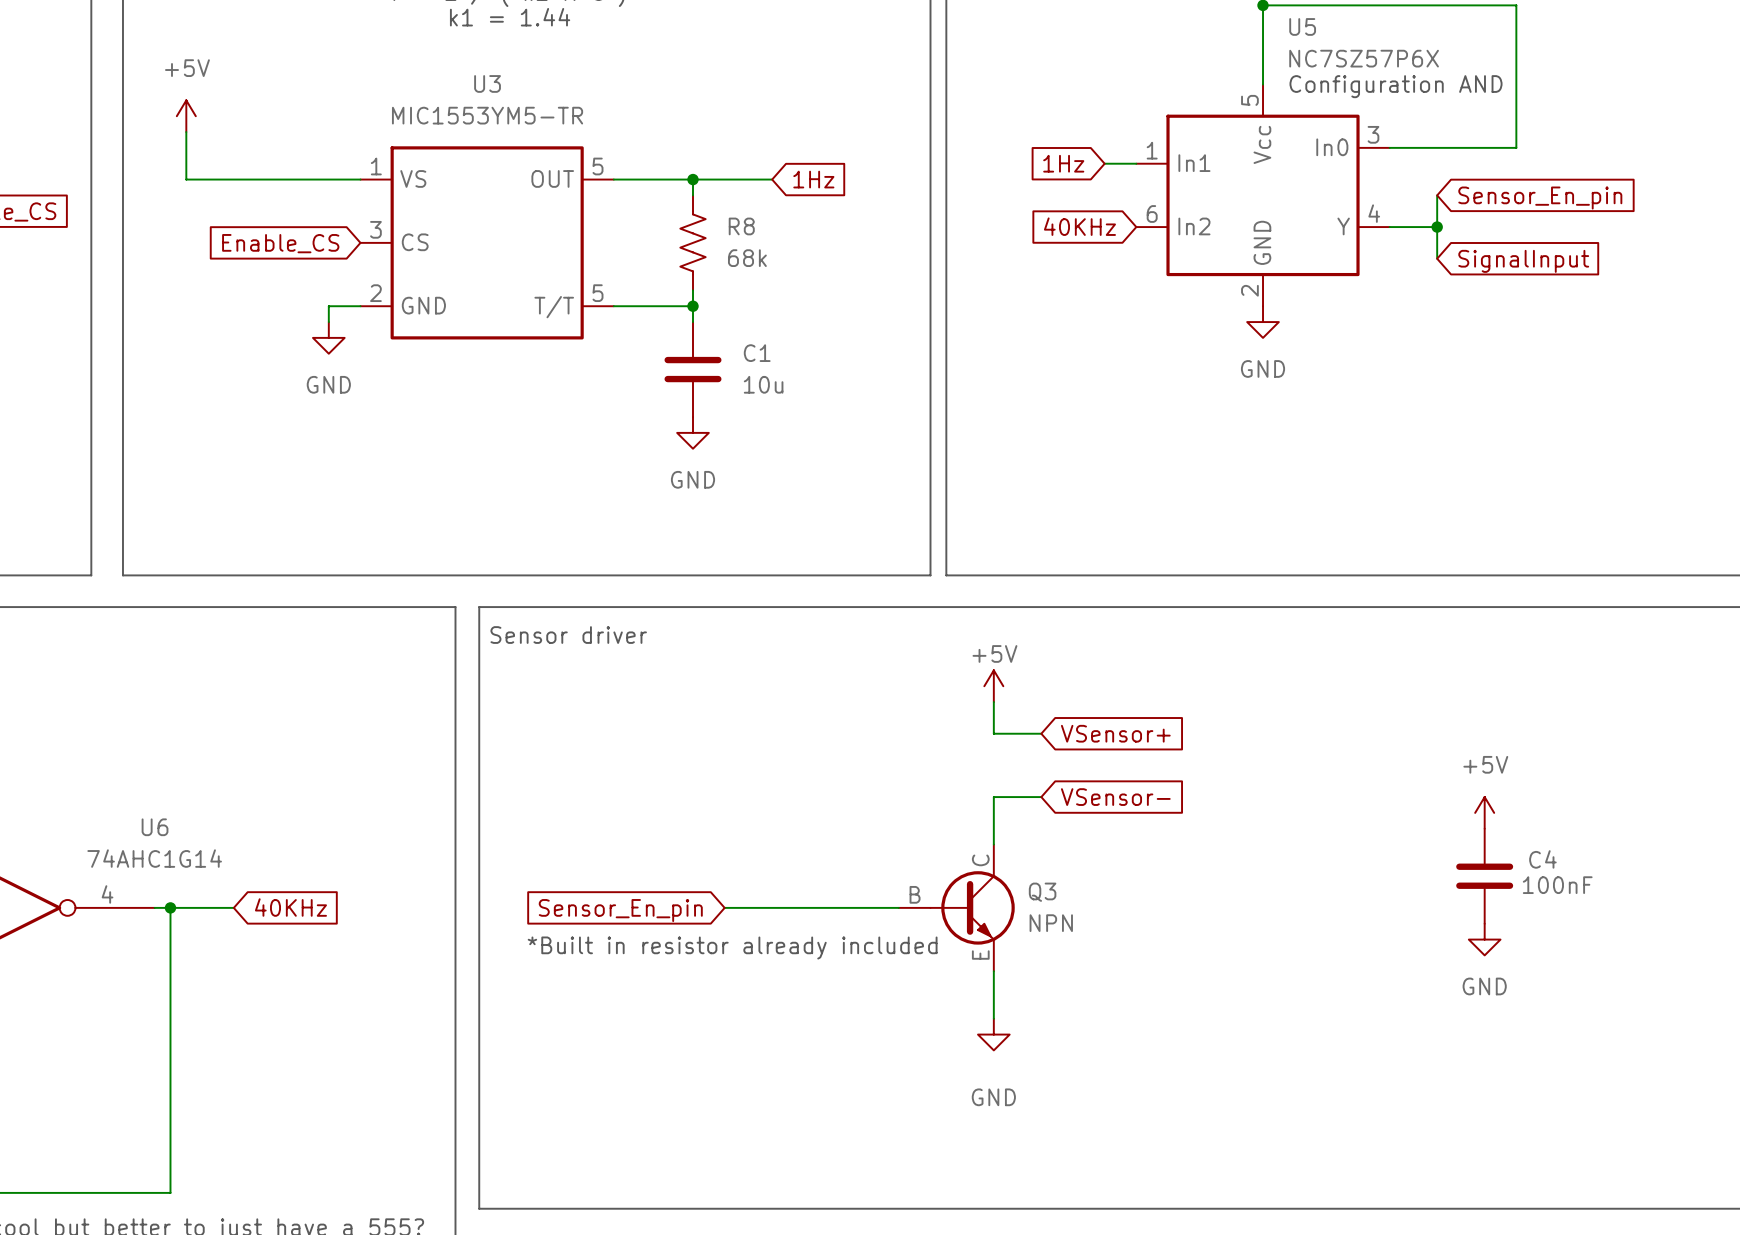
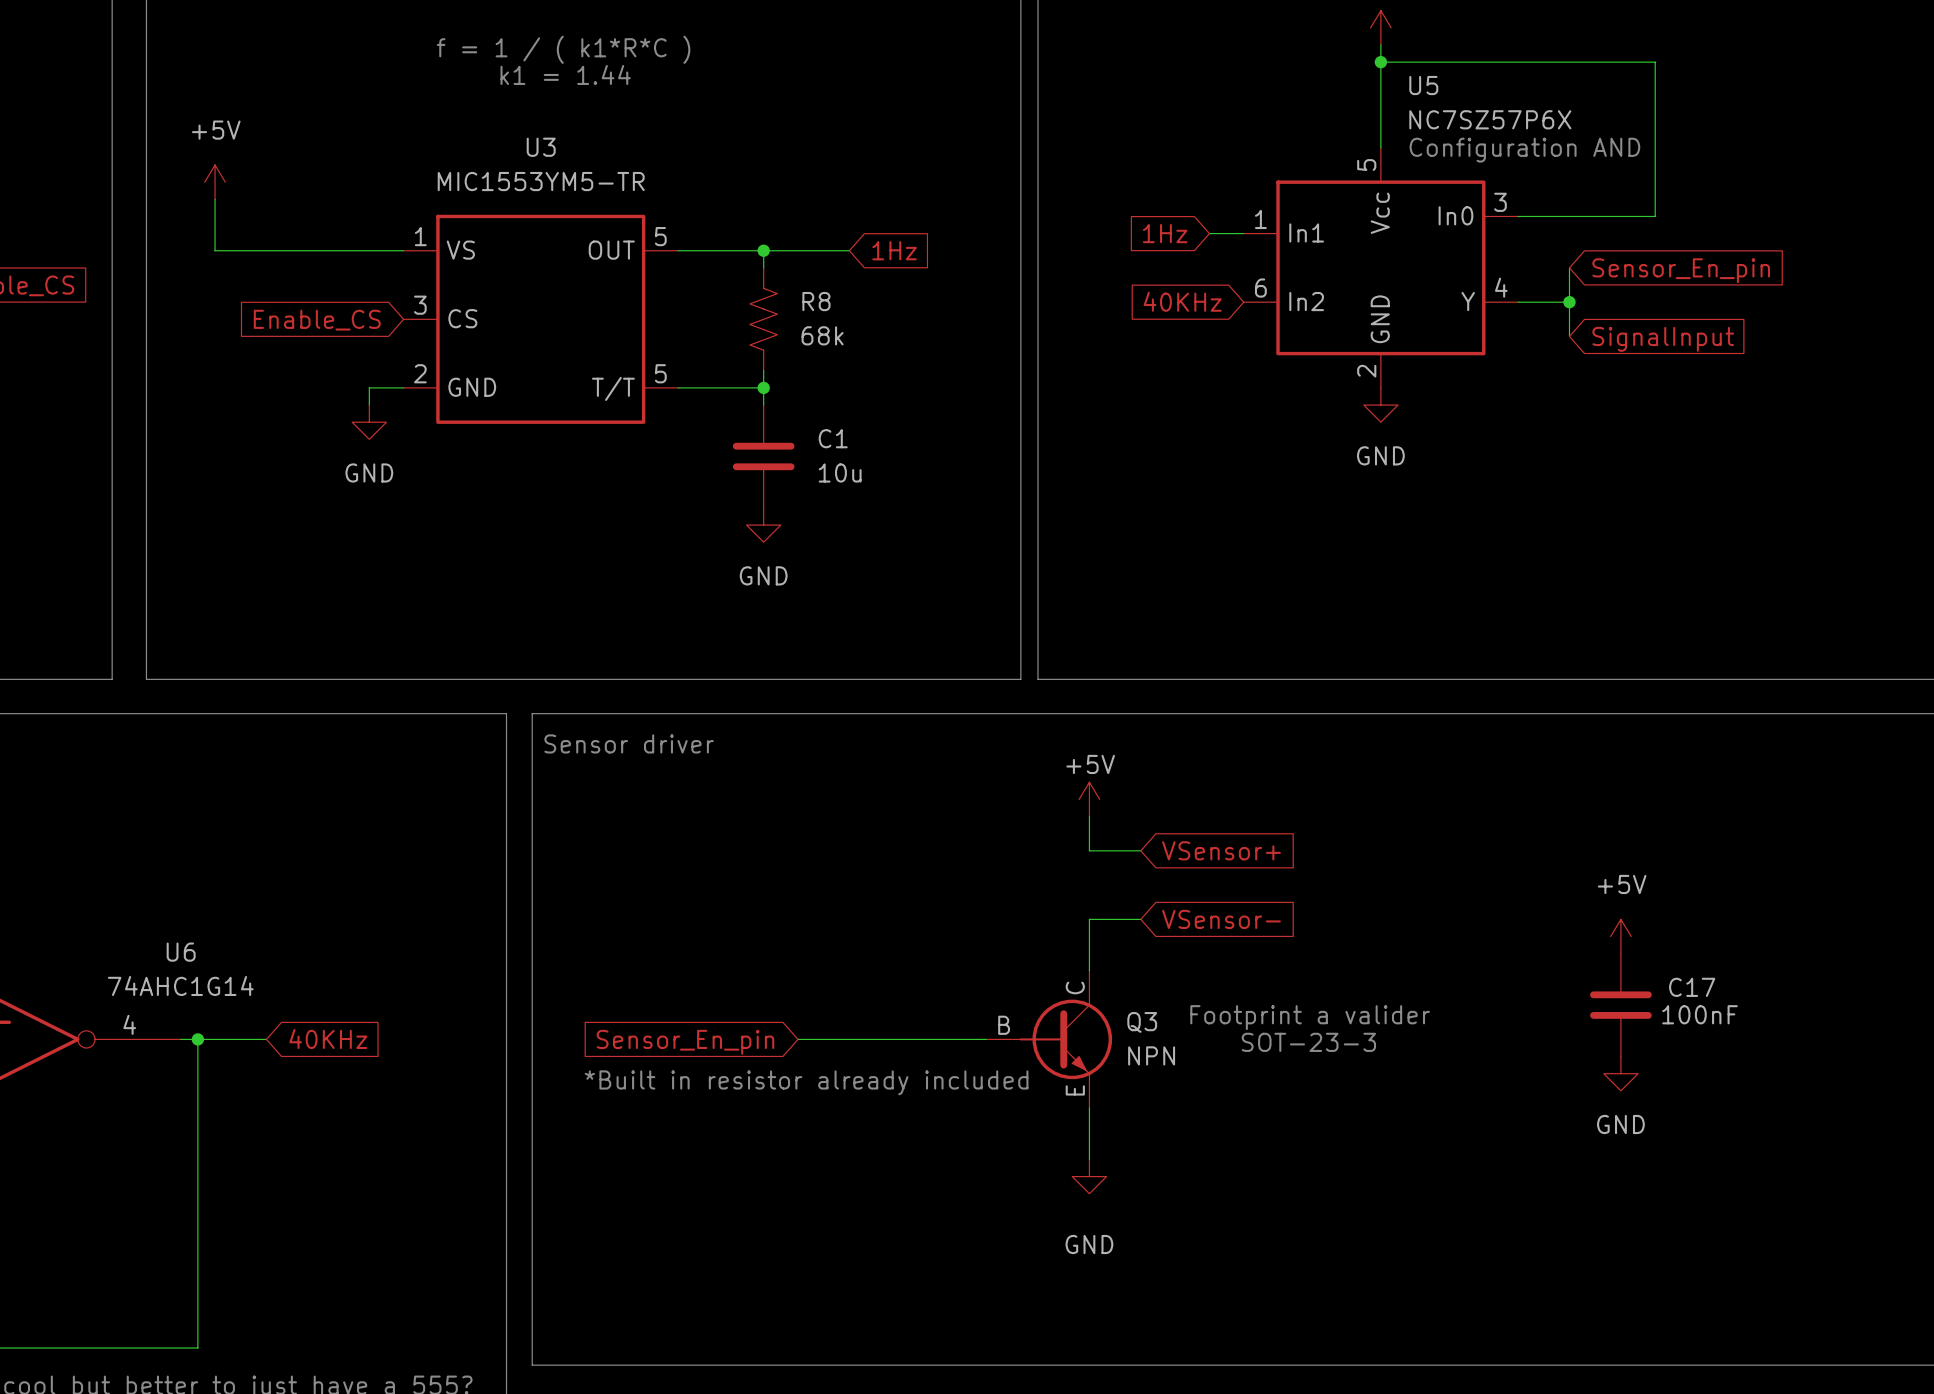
C4 name: C4 (1542, 859) -> C17 (1692, 987)
text: none -> Footprint a valider (1310, 1017)
text: none -> SOT-23-3 (1308, 1042)

